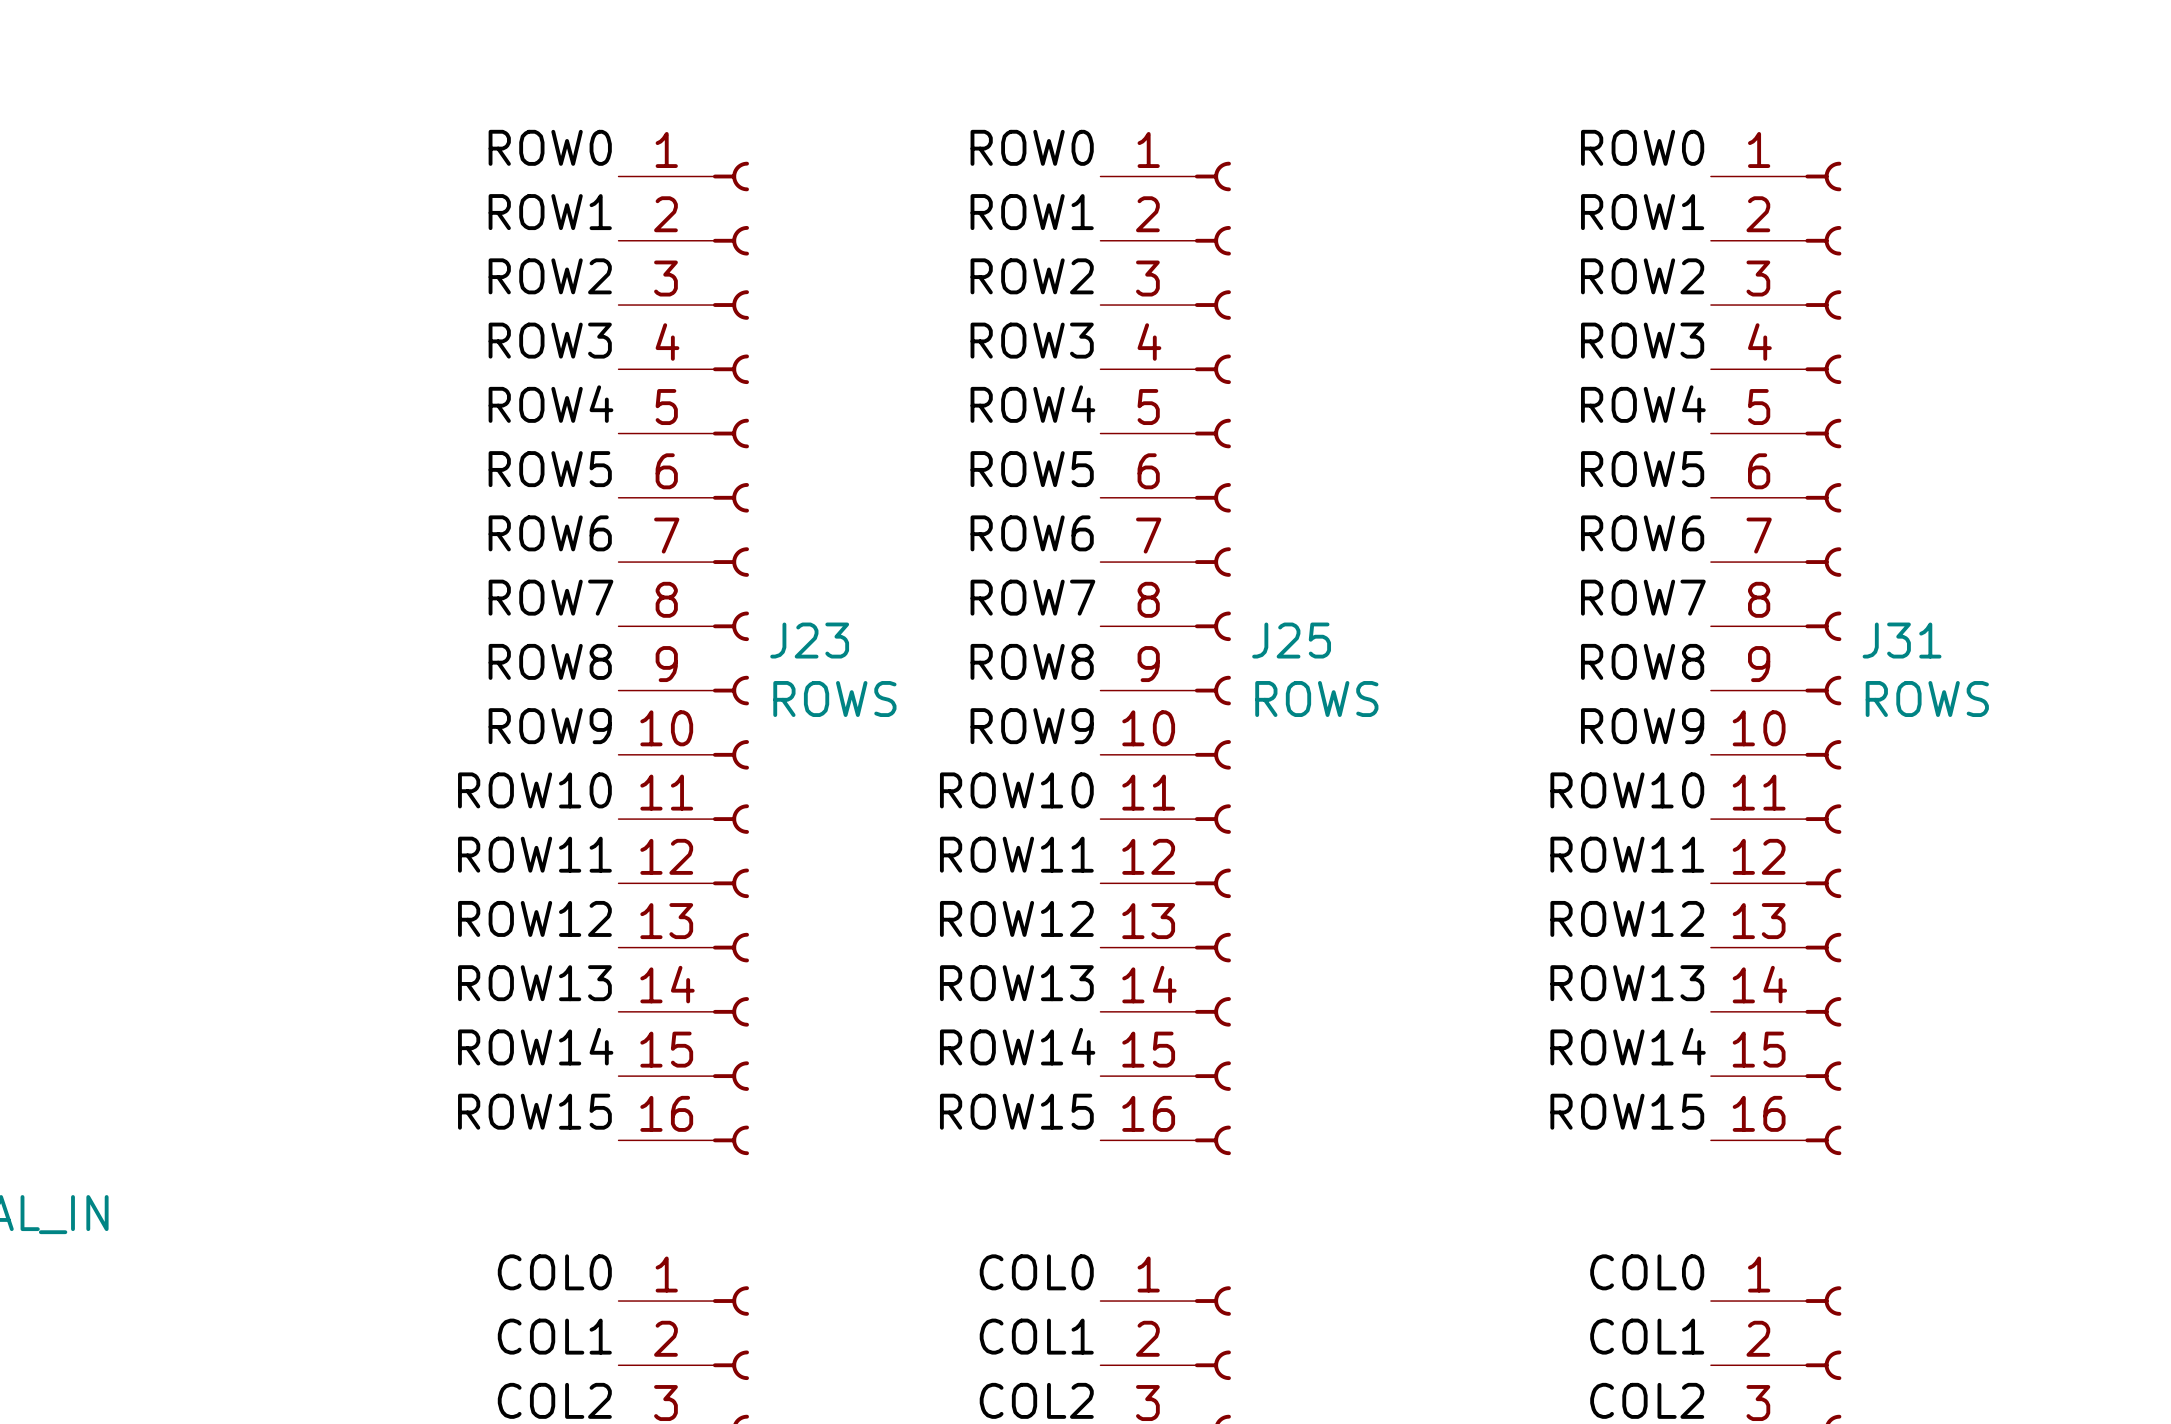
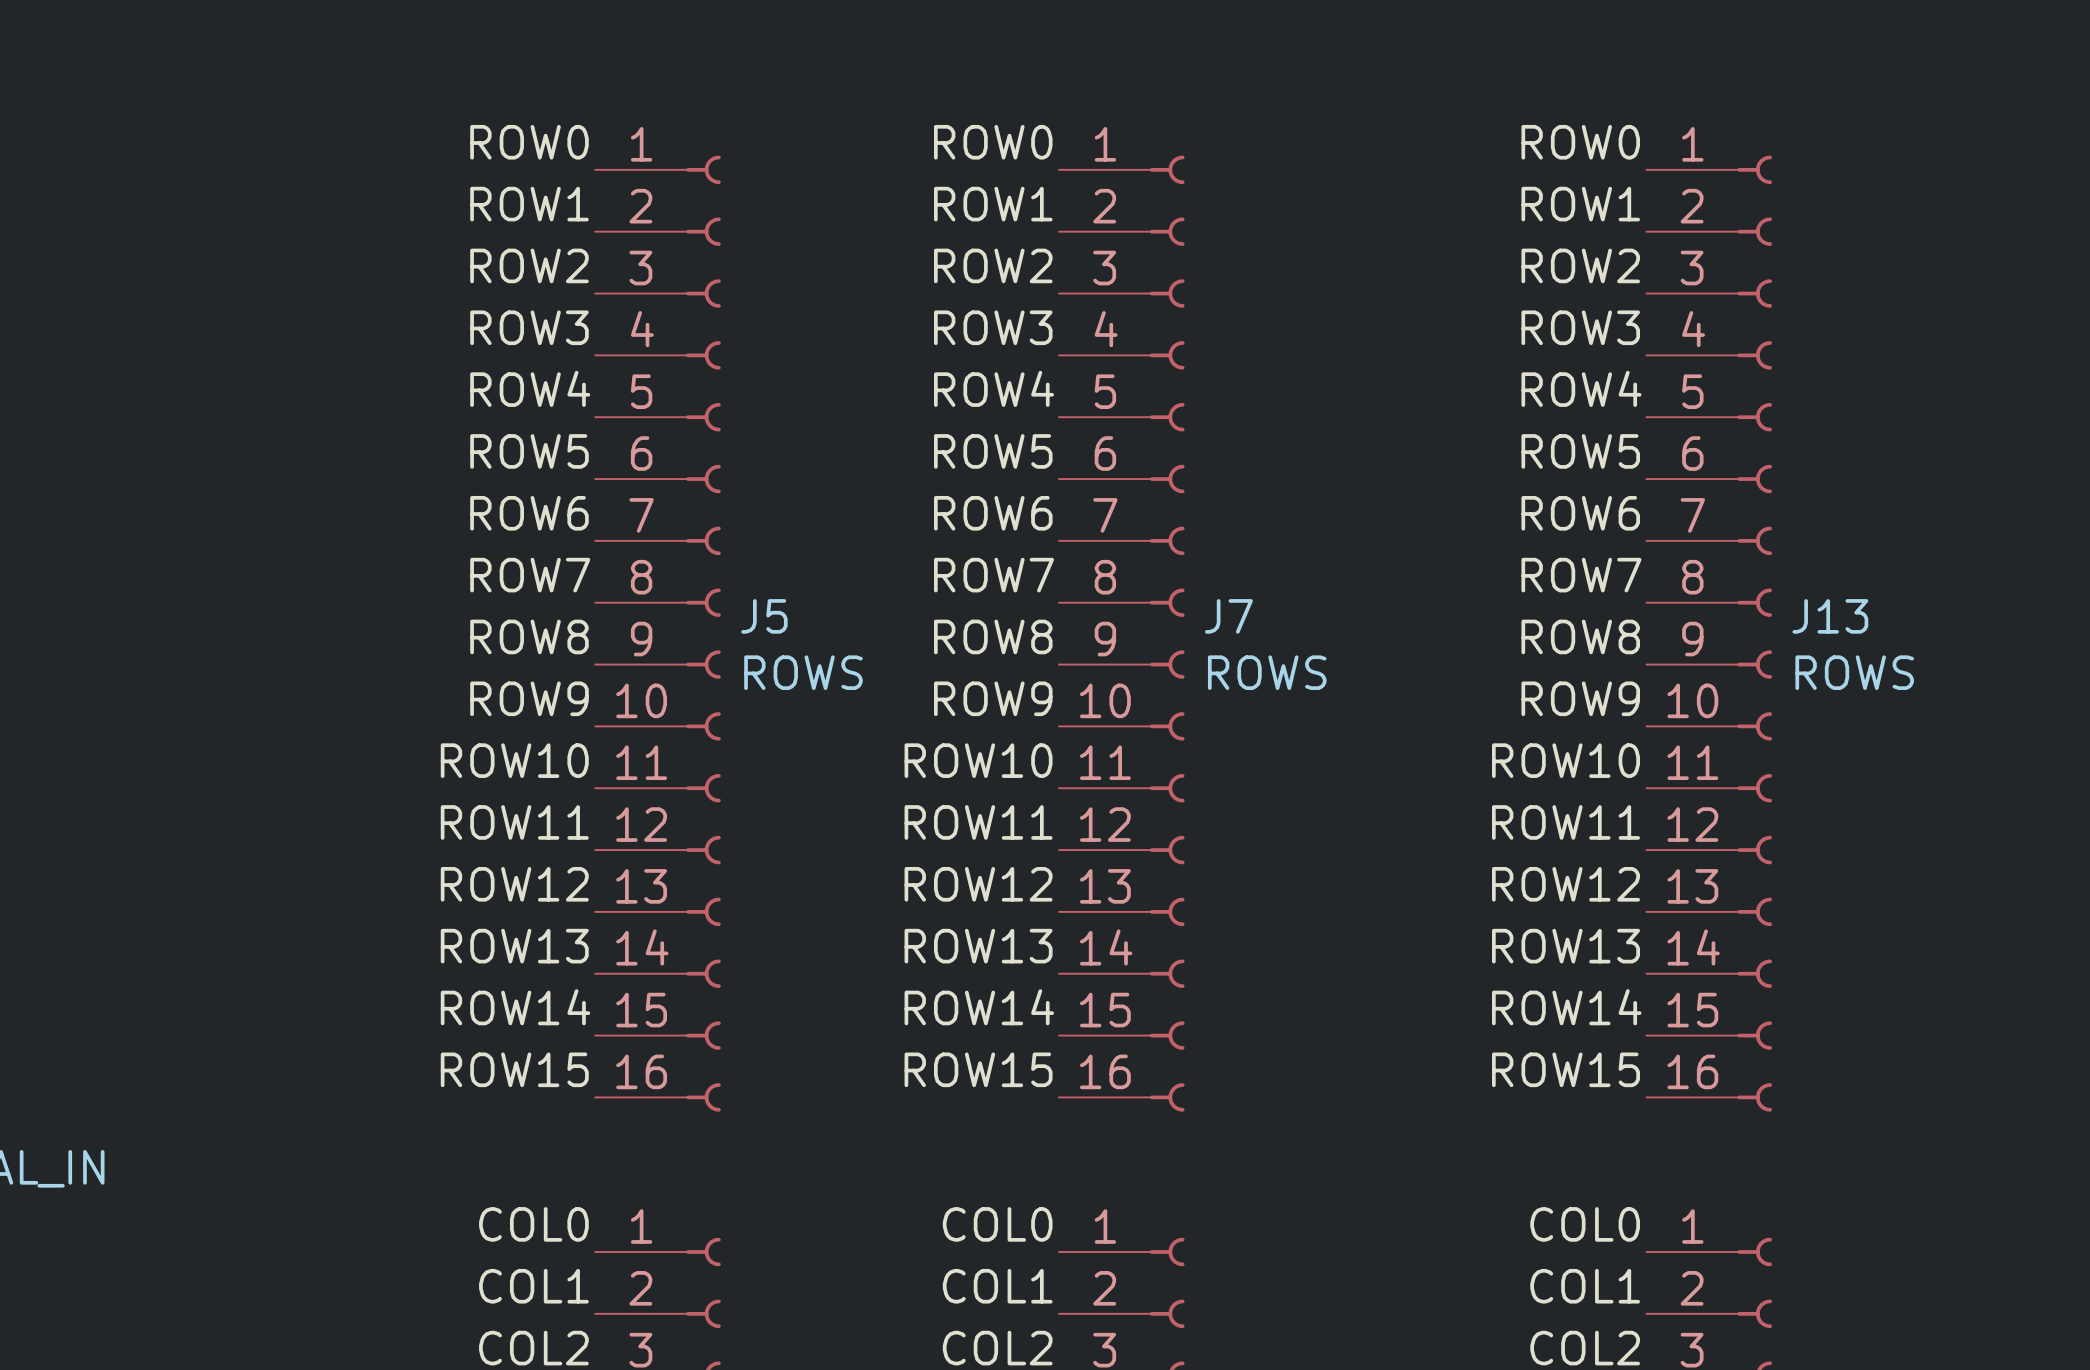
J23 name: J23 (809, 640) -> J5 (764, 616)
J25 name: J25 (1291, 640) -> J7 (1228, 616)
J31 name: J31 (1902, 640) -> J13 (1830, 616)

